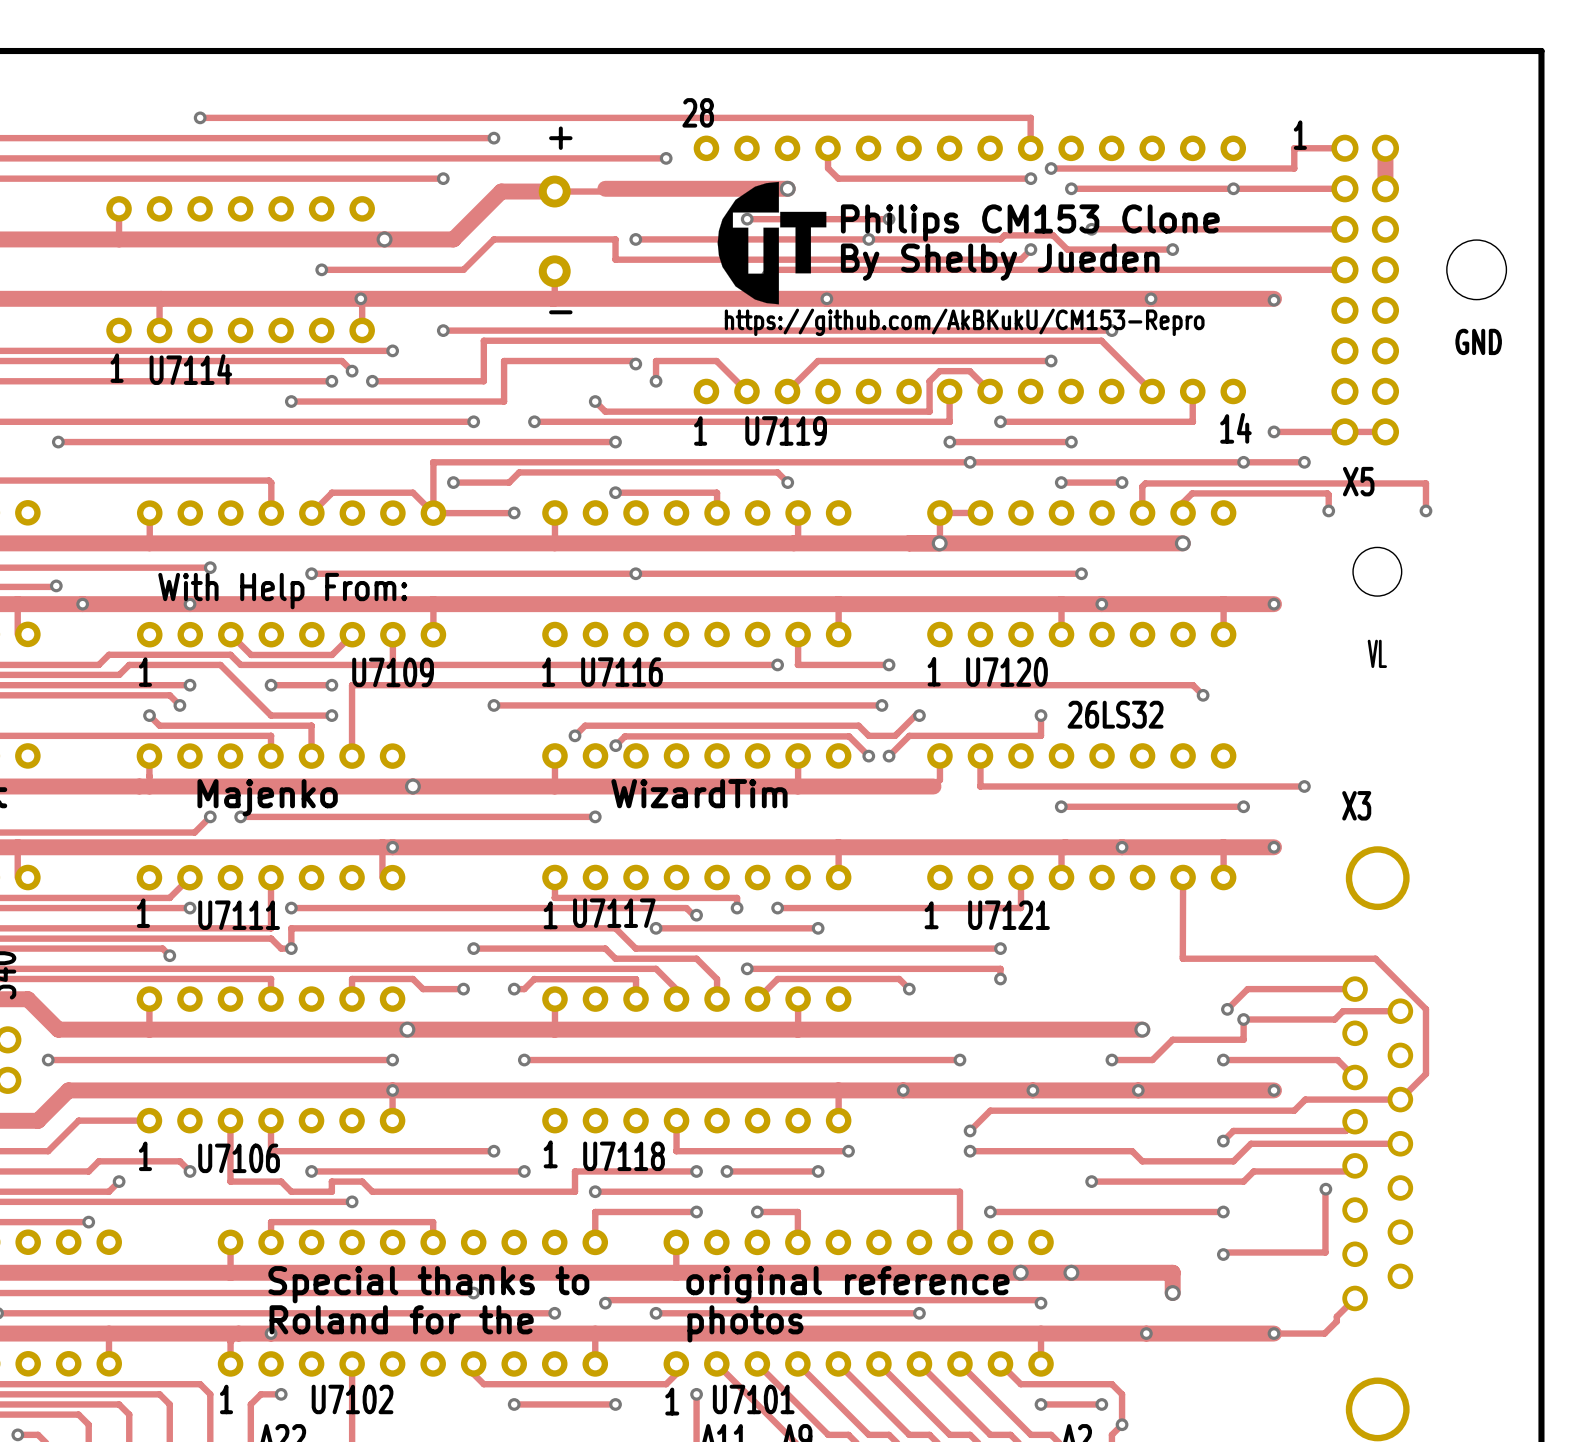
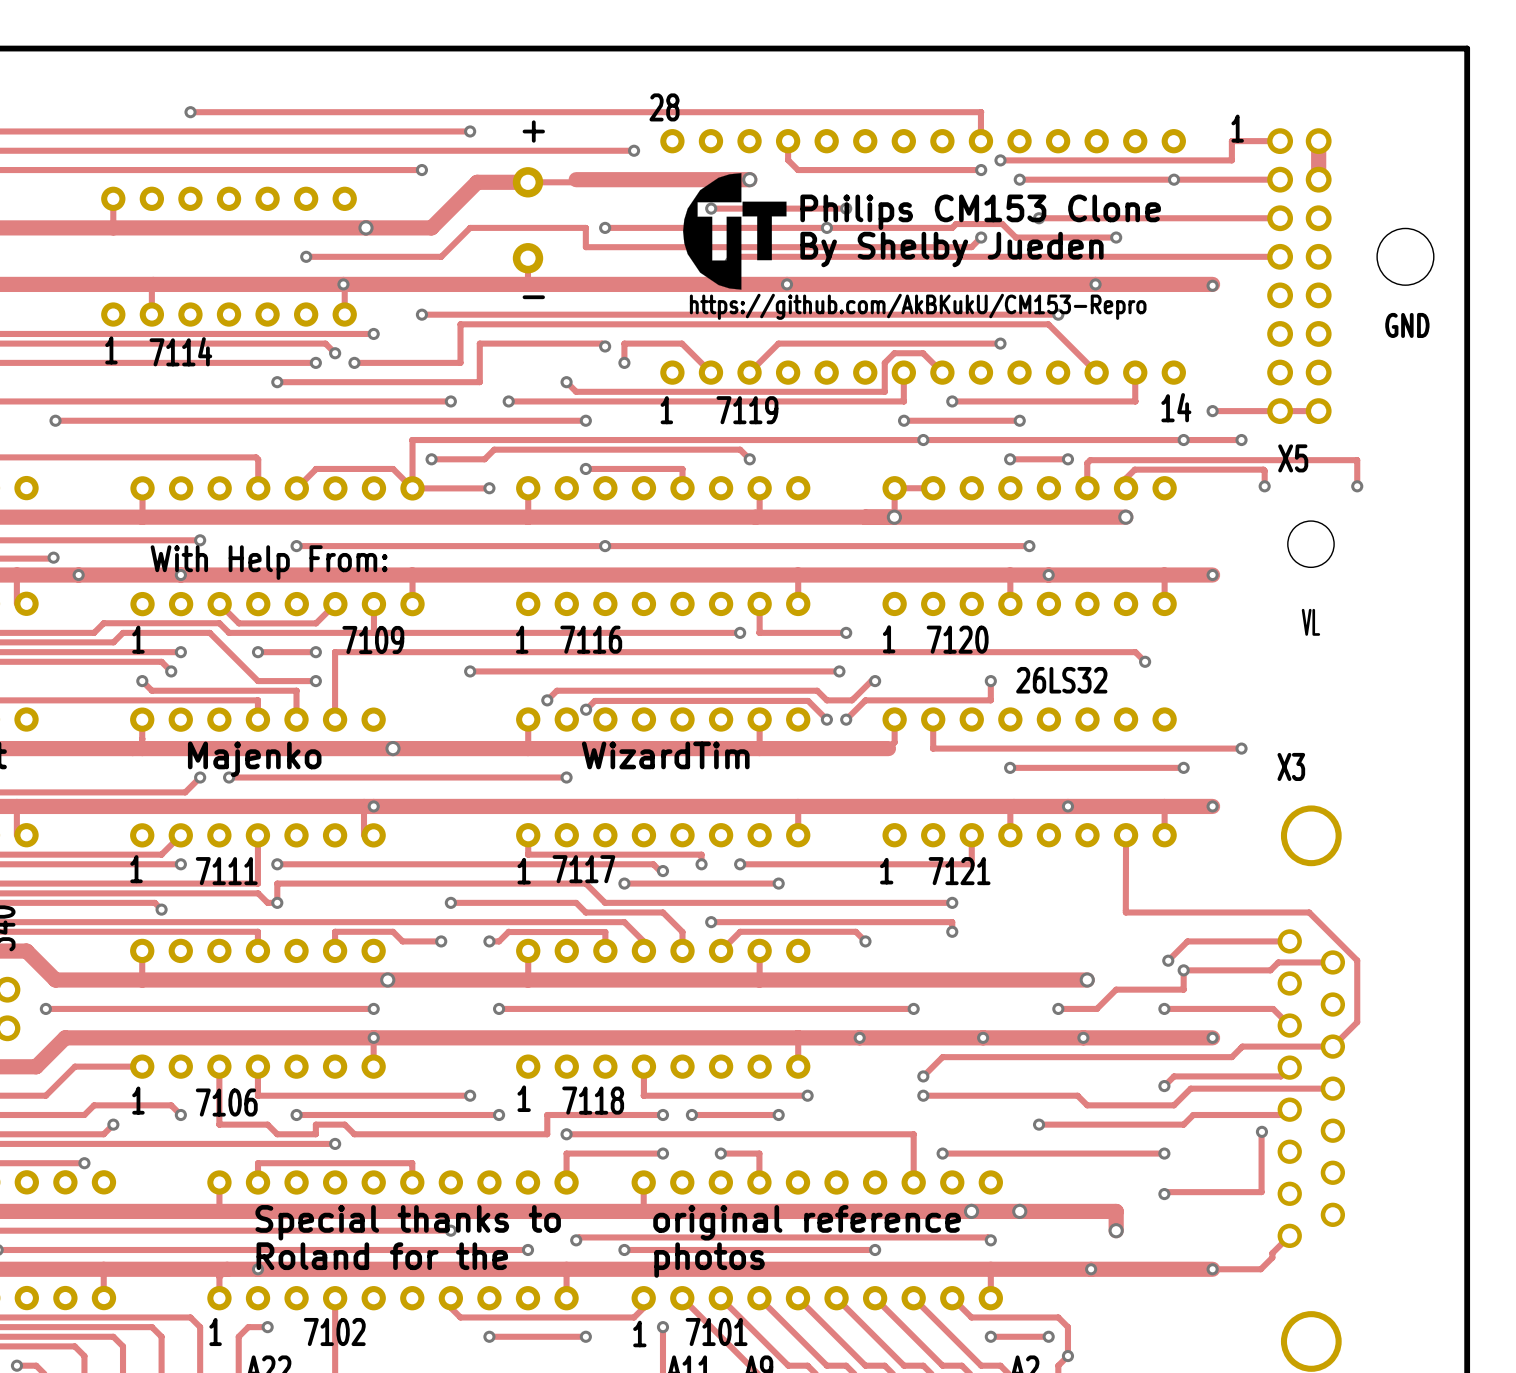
U7114 name: U7114 (190, 369) -> 7114 (180, 351)
U7119 name: U7119 (786, 430) -> 7119 (747, 410)
U7109 name: U7109 (393, 672) -> 7109 (373, 639)
U7116 name: U7116 (622, 672) -> 7116 (591, 639)
U7120 name: U7120 (1006, 672) -> 7120 (957, 639)
U7117 name: U7117 (614, 913) -> 7117 (583, 869)
U7111 name: U7111 (239, 915) -> 7111 (226, 871)
U7121 name: U7121 (1009, 915) -> 7121 (959, 871)
U7118 name: U7118 (624, 1156) -> 7118 (593, 1100)
U7106 name: U7106 (239, 1158) -> 7106 (226, 1102)
U7102 name: U7102 (352, 1399) -> 7102 (334, 1332)
U7101 name: U7101 (753, 1399) -> 7101 (716, 1332)

